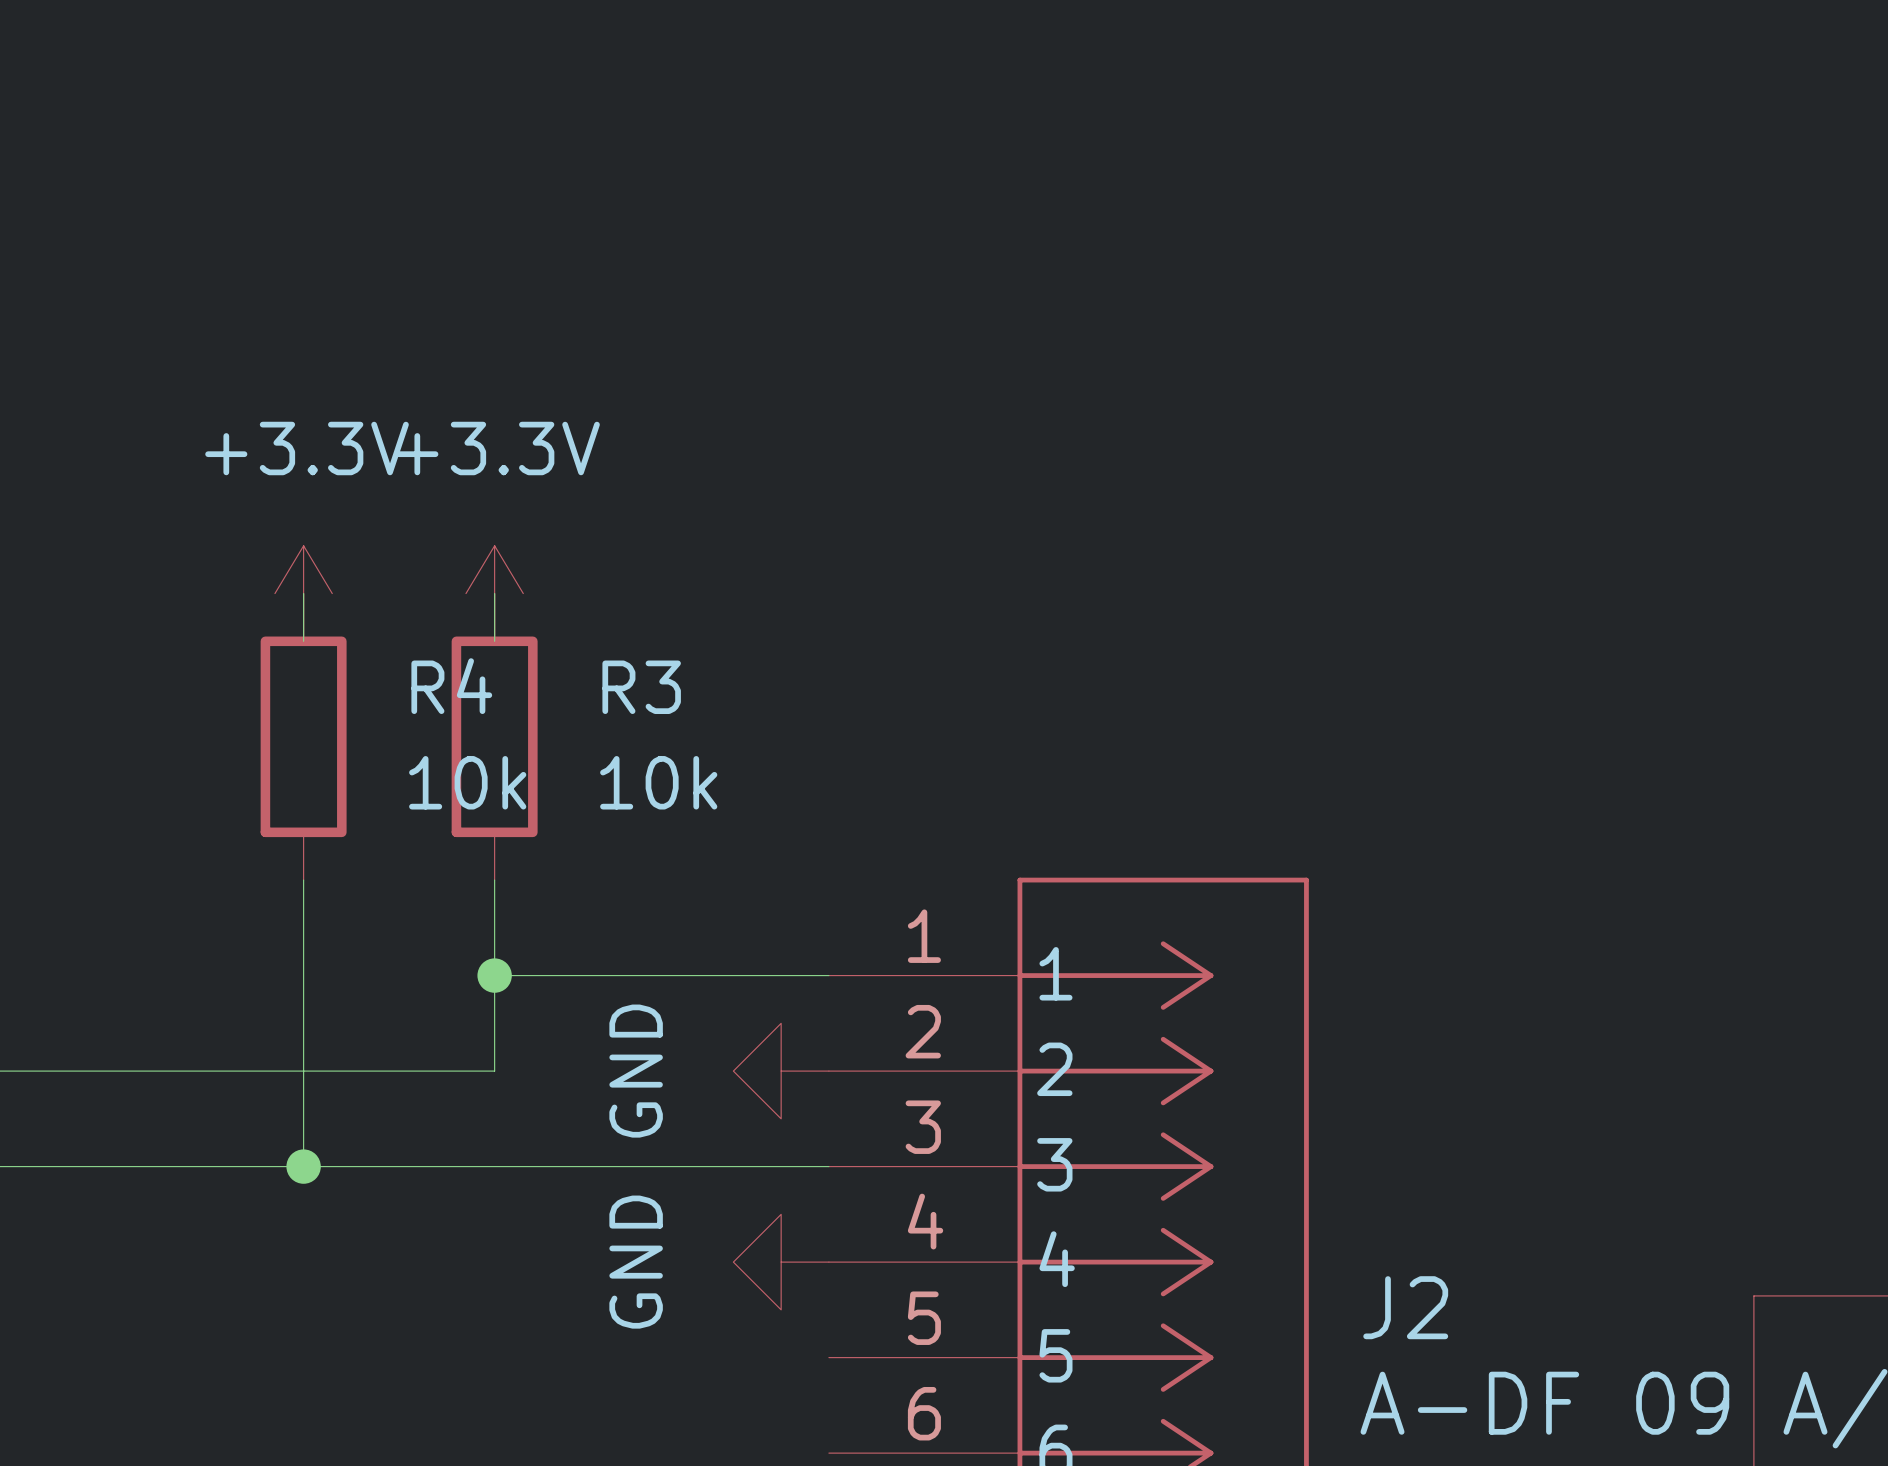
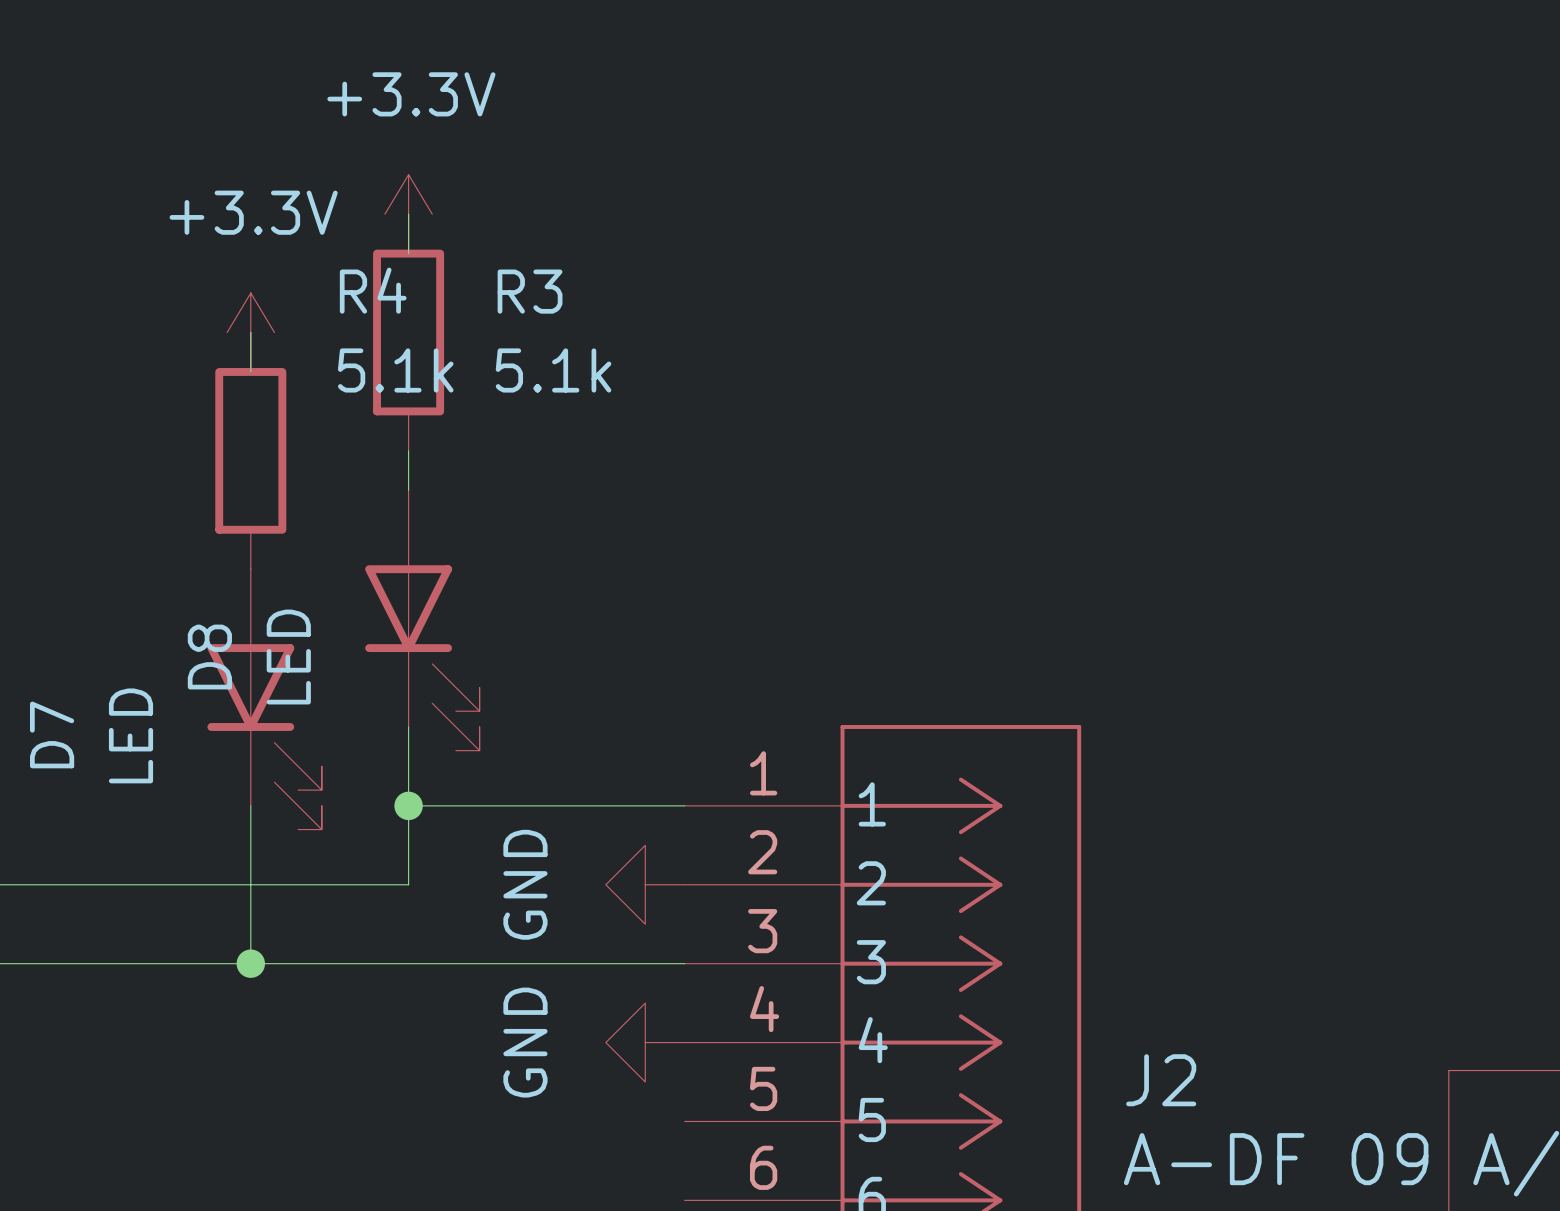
wire: none -> (408, 214) (408, 253)
power symbol: none -> +3.3V (408, 214)
power symbol: none -> +3.3V (250, 332)
wire: (303, 593) (303, 641) -> (250, 332) (250, 371)
power symbol: +3.3V (303, 593) -> none
power symbol: +3.3V (494, 593) -> none
R4 name position: R4 (451, 686) -> R4 (373, 290)
R4 position: (303, 736) -> (250, 450)
R3 position: (494, 736) -> (408, 332)
D8: none -> LED (422, 620)
R4 value: 10k (467, 782) -> 5.1k (395, 370)
R3 value: 10k (658, 782) -> 5.1k (553, 370)
D7: none -> LED (264, 699)

